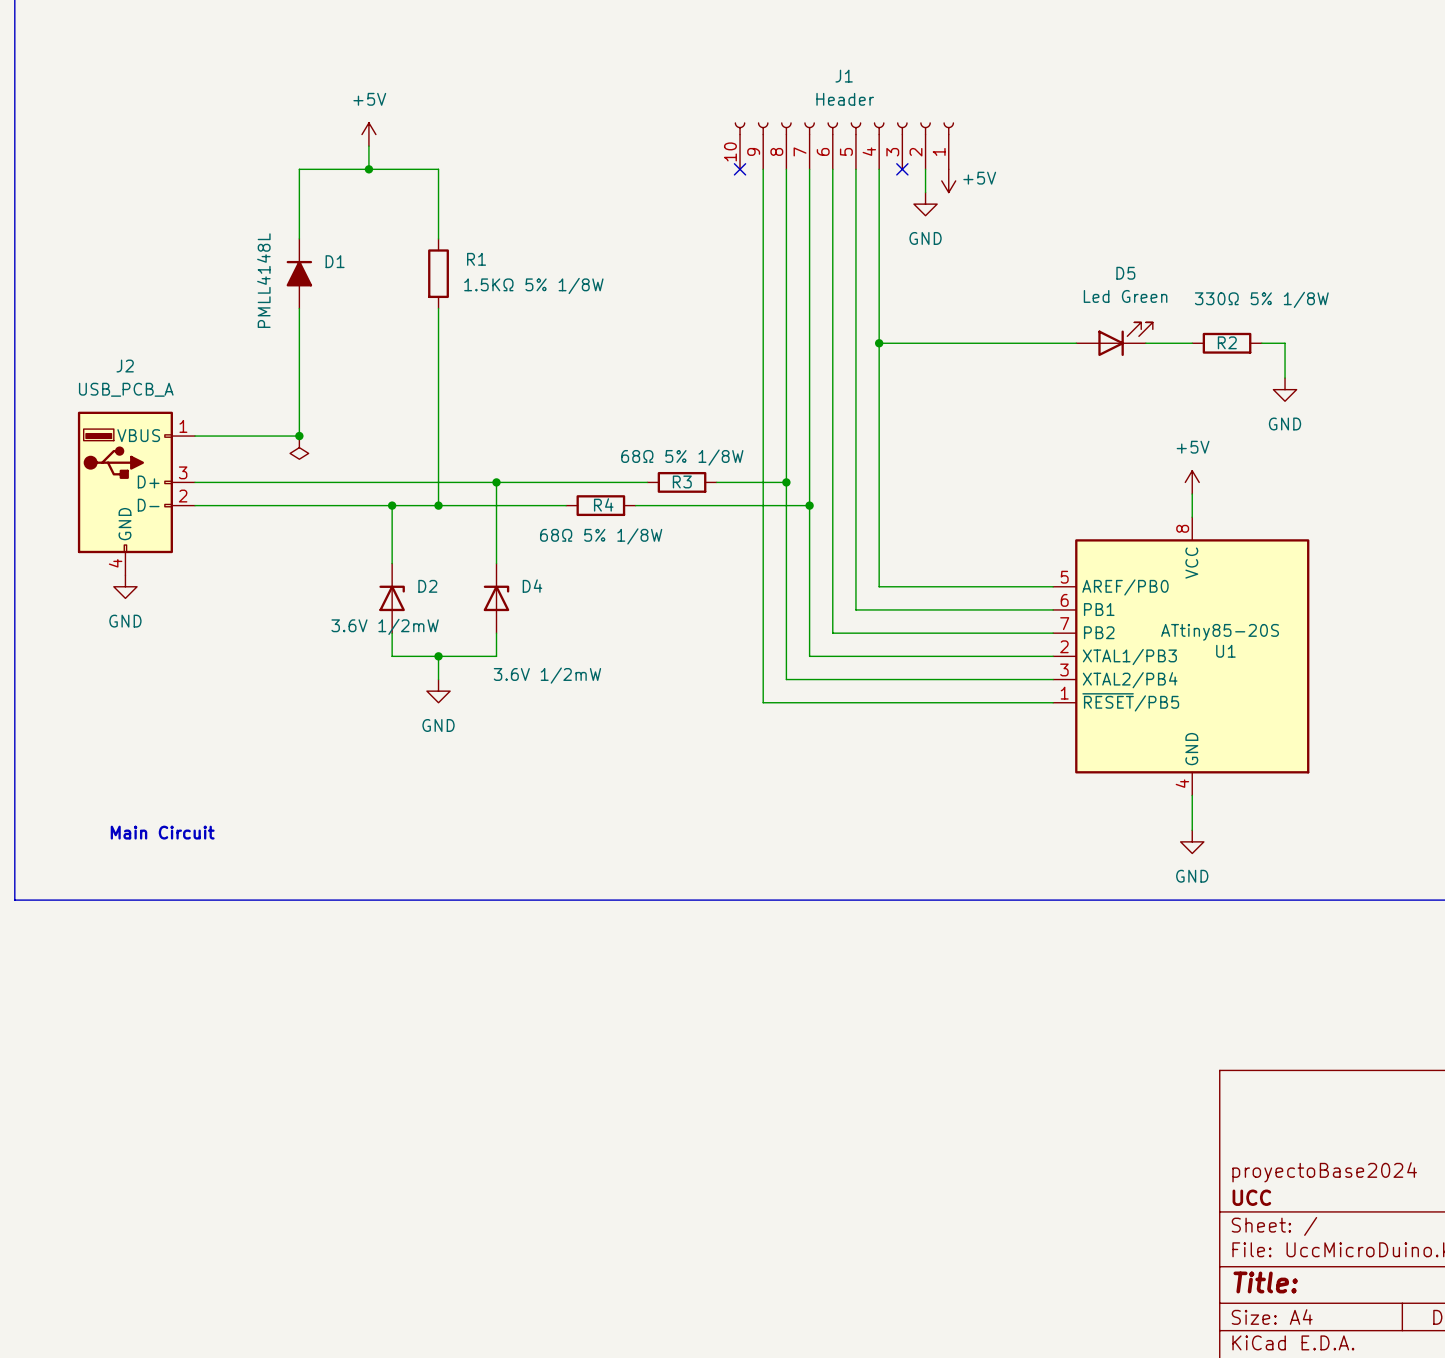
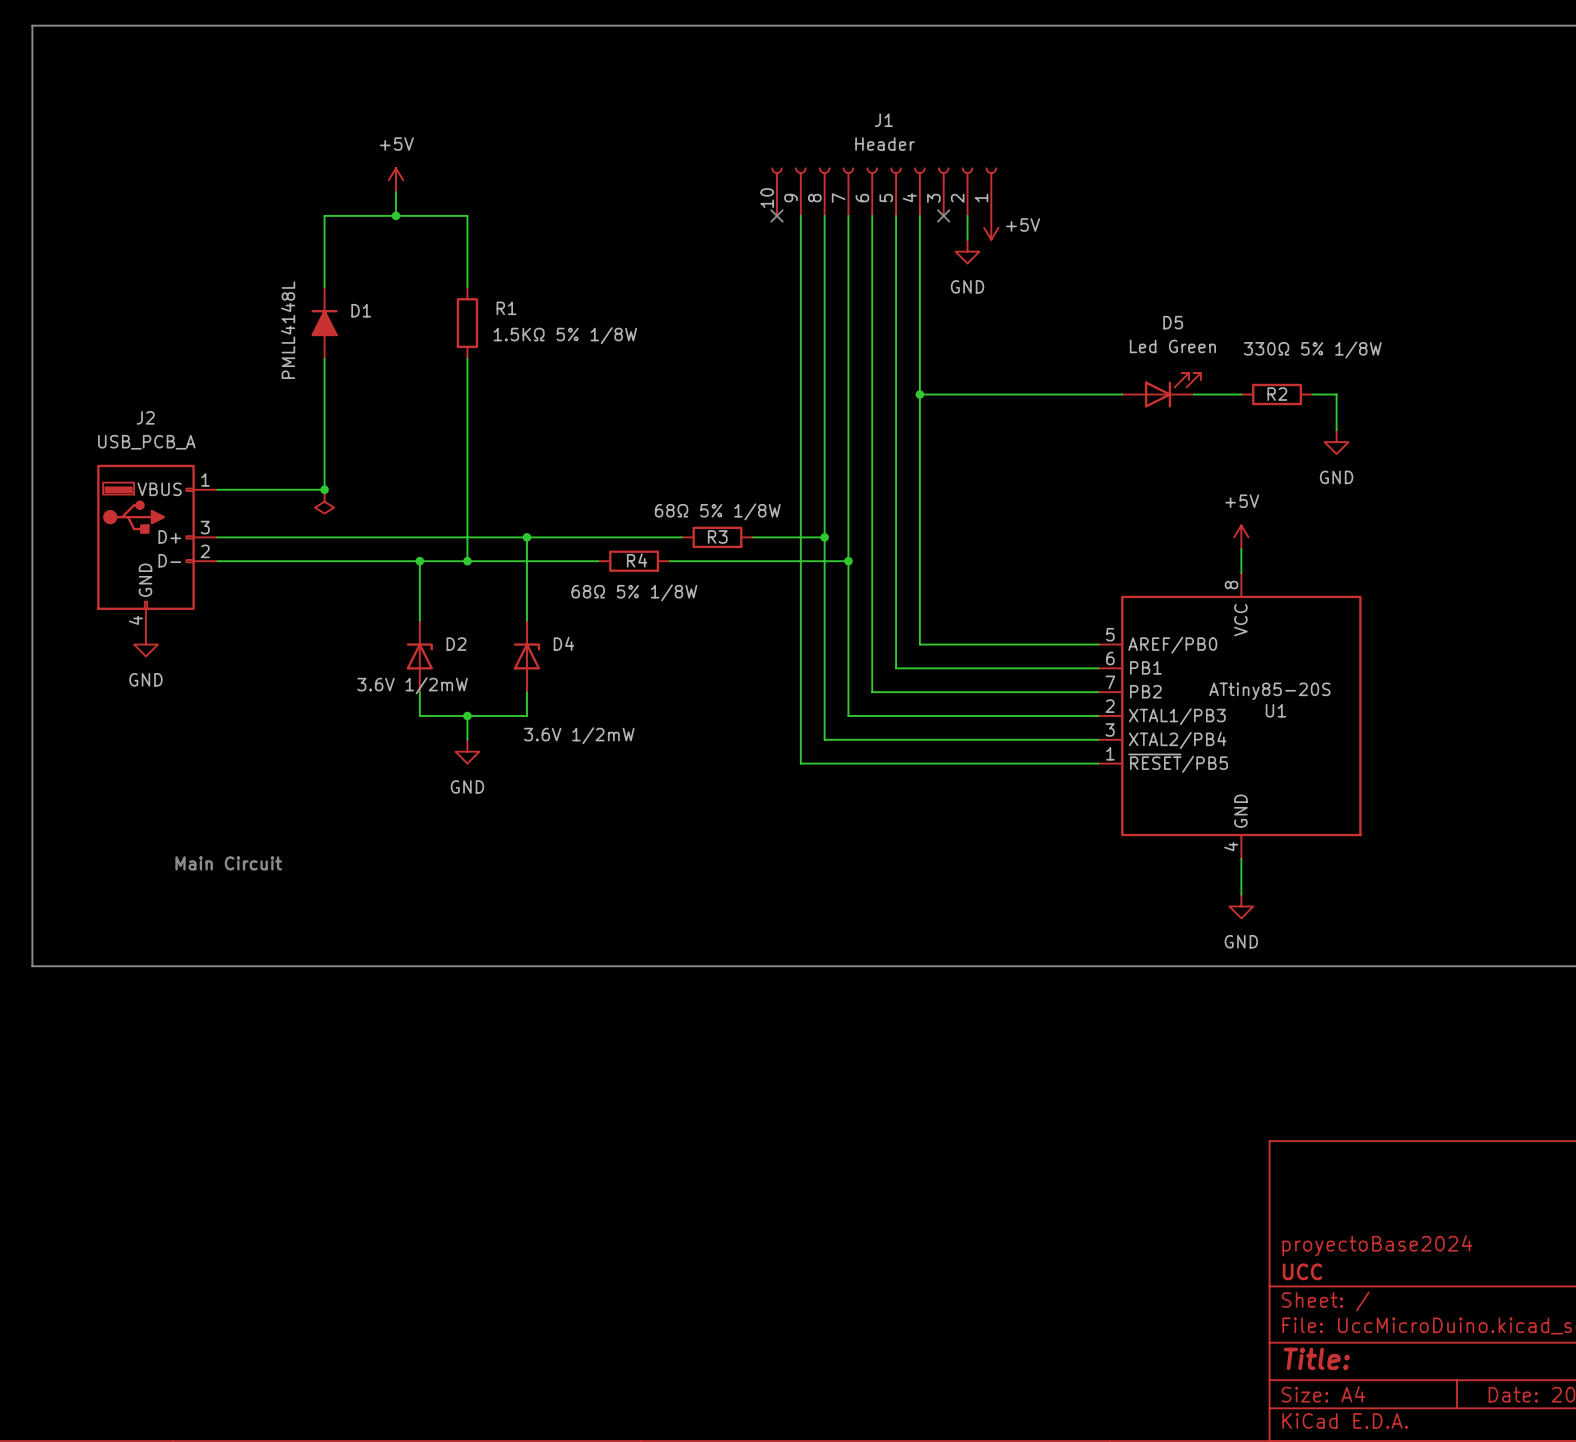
text position: Main Circuit (162, 832) -> Main Circuit (228, 863)

